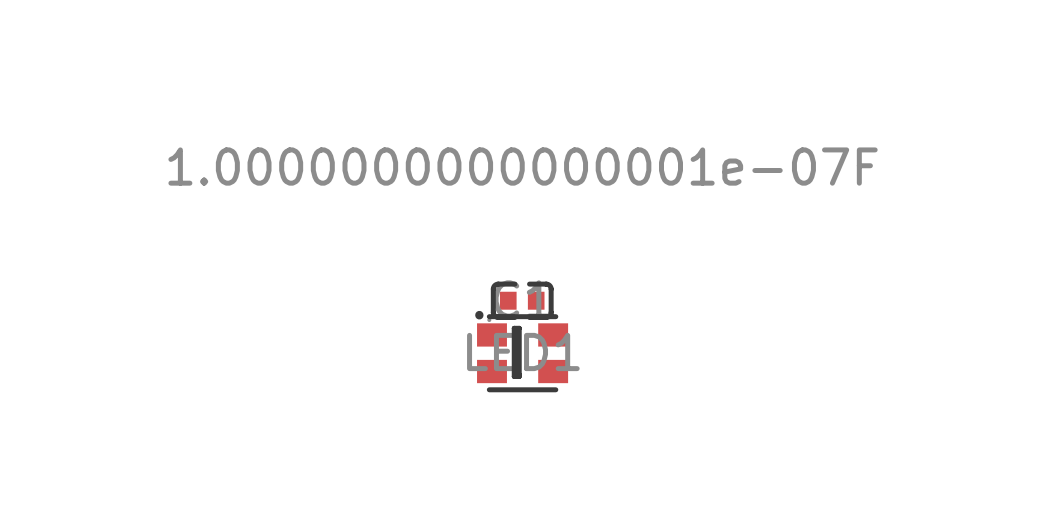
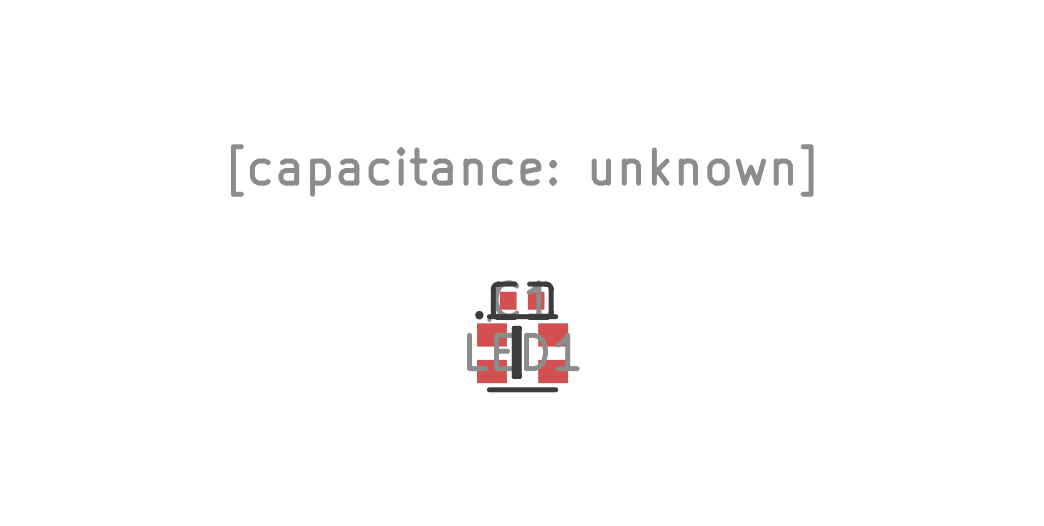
part value: 1.0000000000000001e-07F (523, 166) -> [capacitance: unknown] (522, 170)

